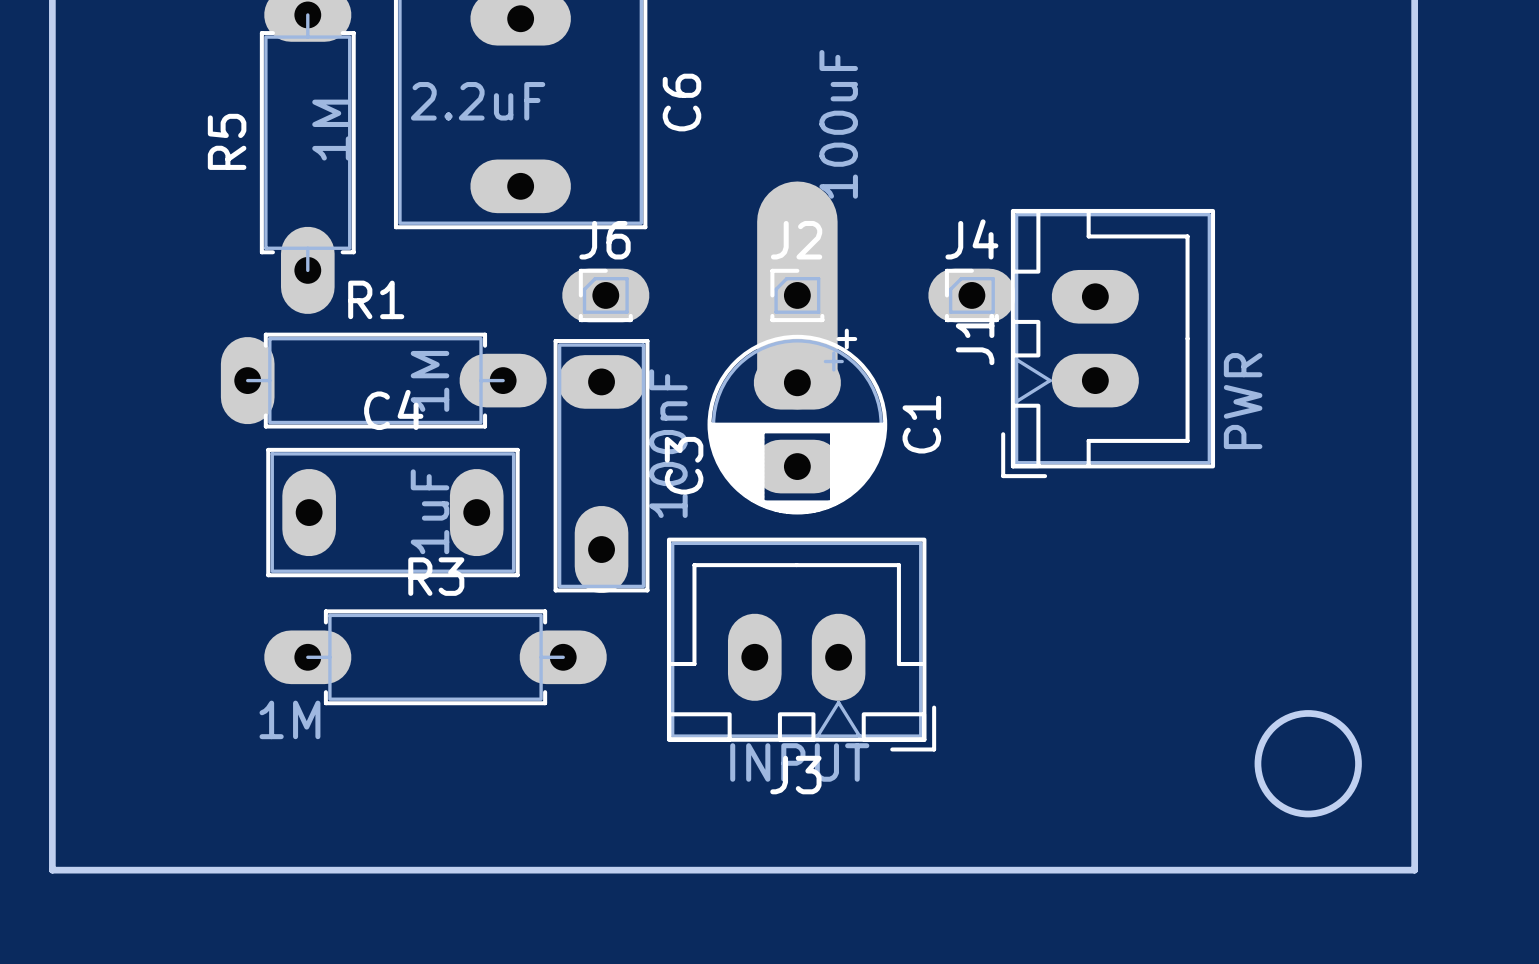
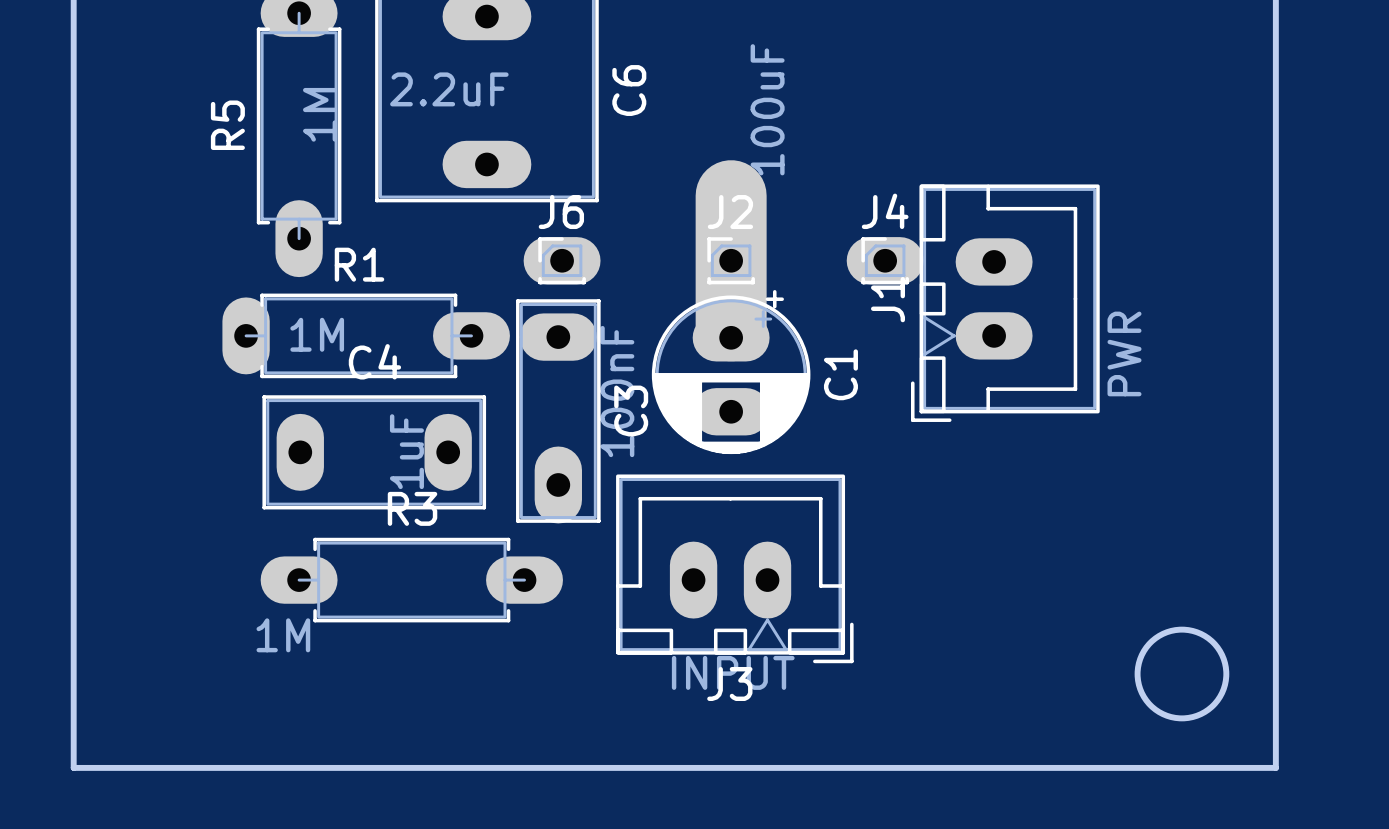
R1 value rotation: 0° (430, 381) -> 90° clockwise (317, 334)
R1 value position: 1M (430, 381) -> 1M (317, 334)

